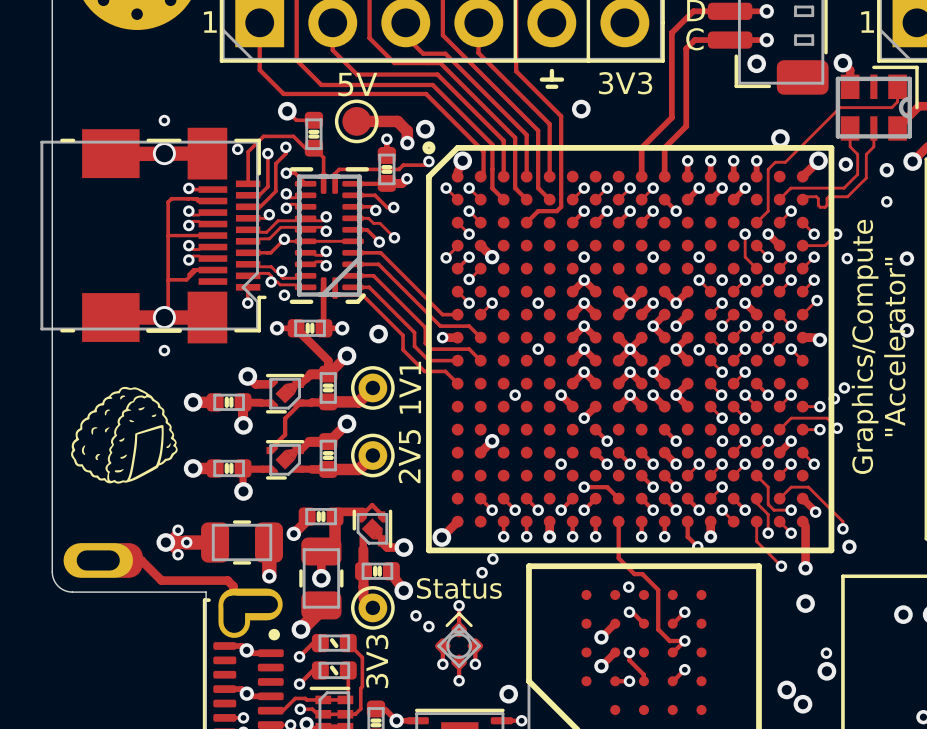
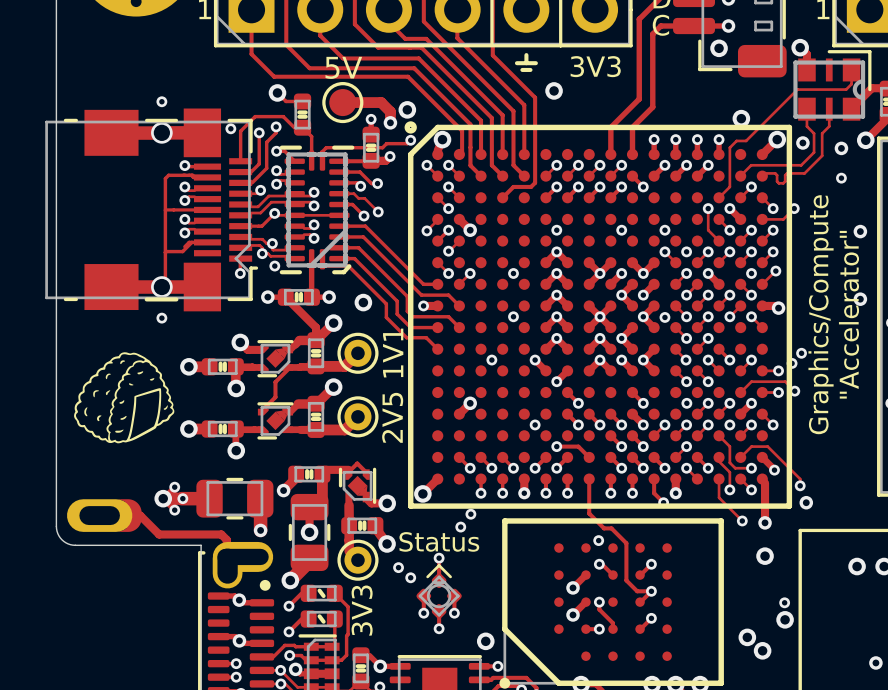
via position: (847, 258) -> (751, 273)

